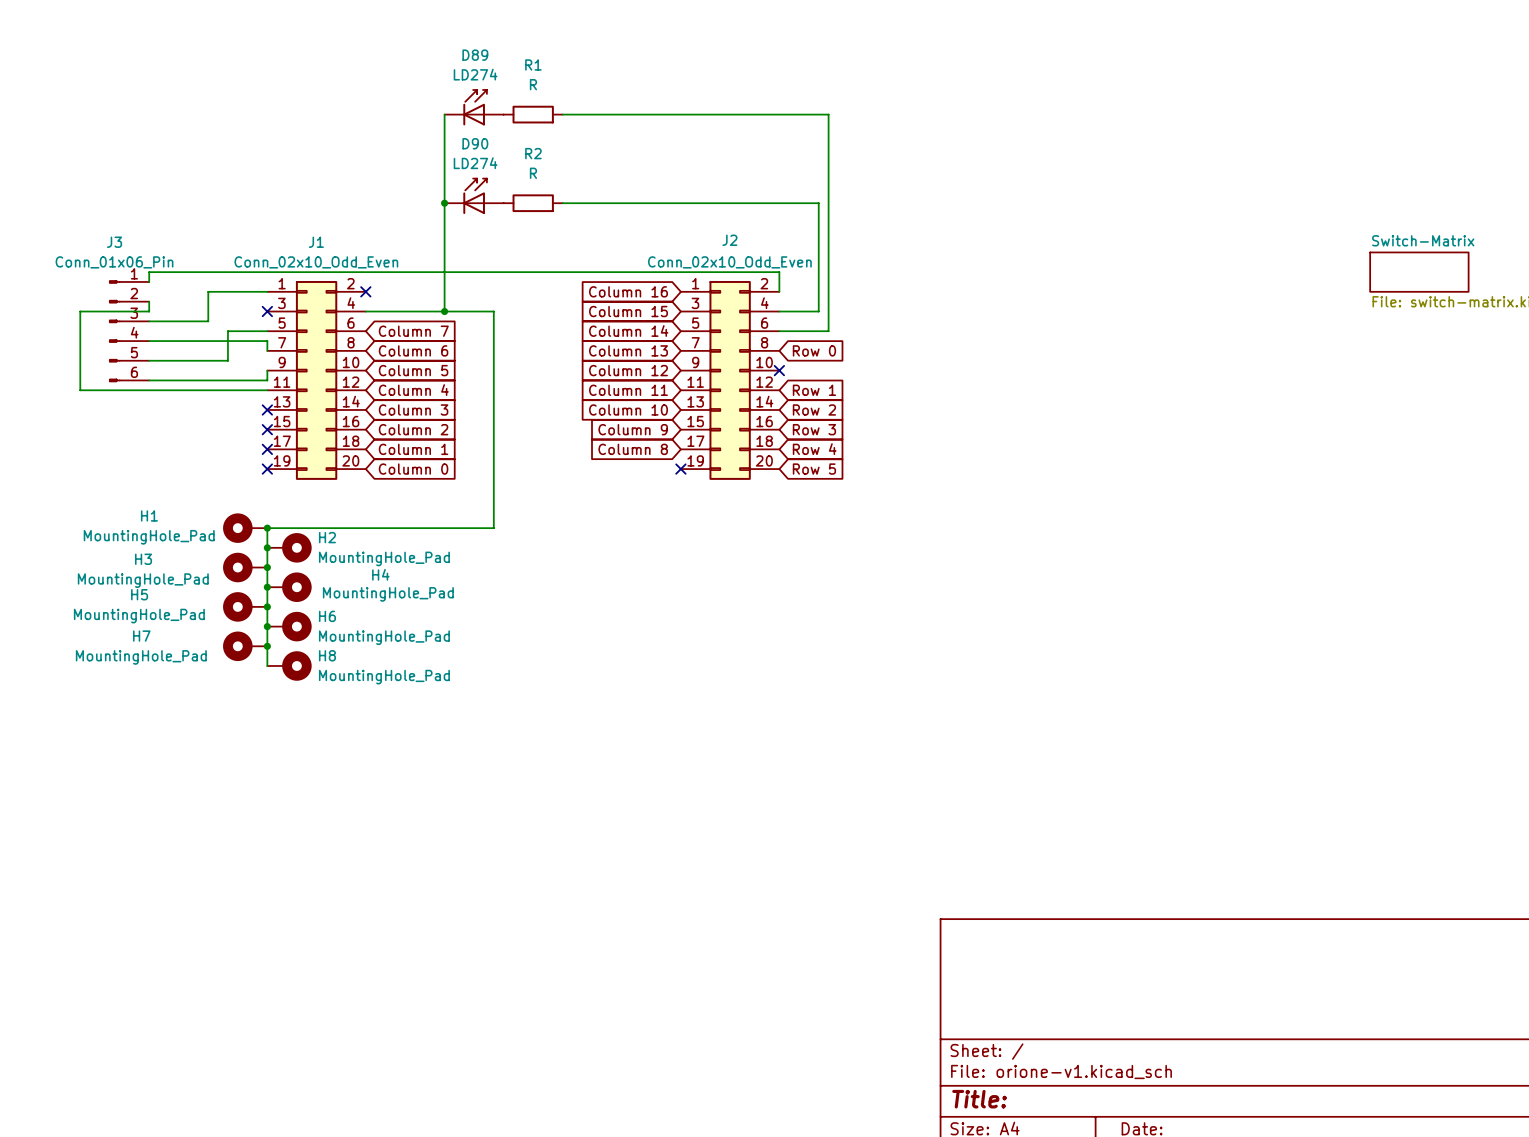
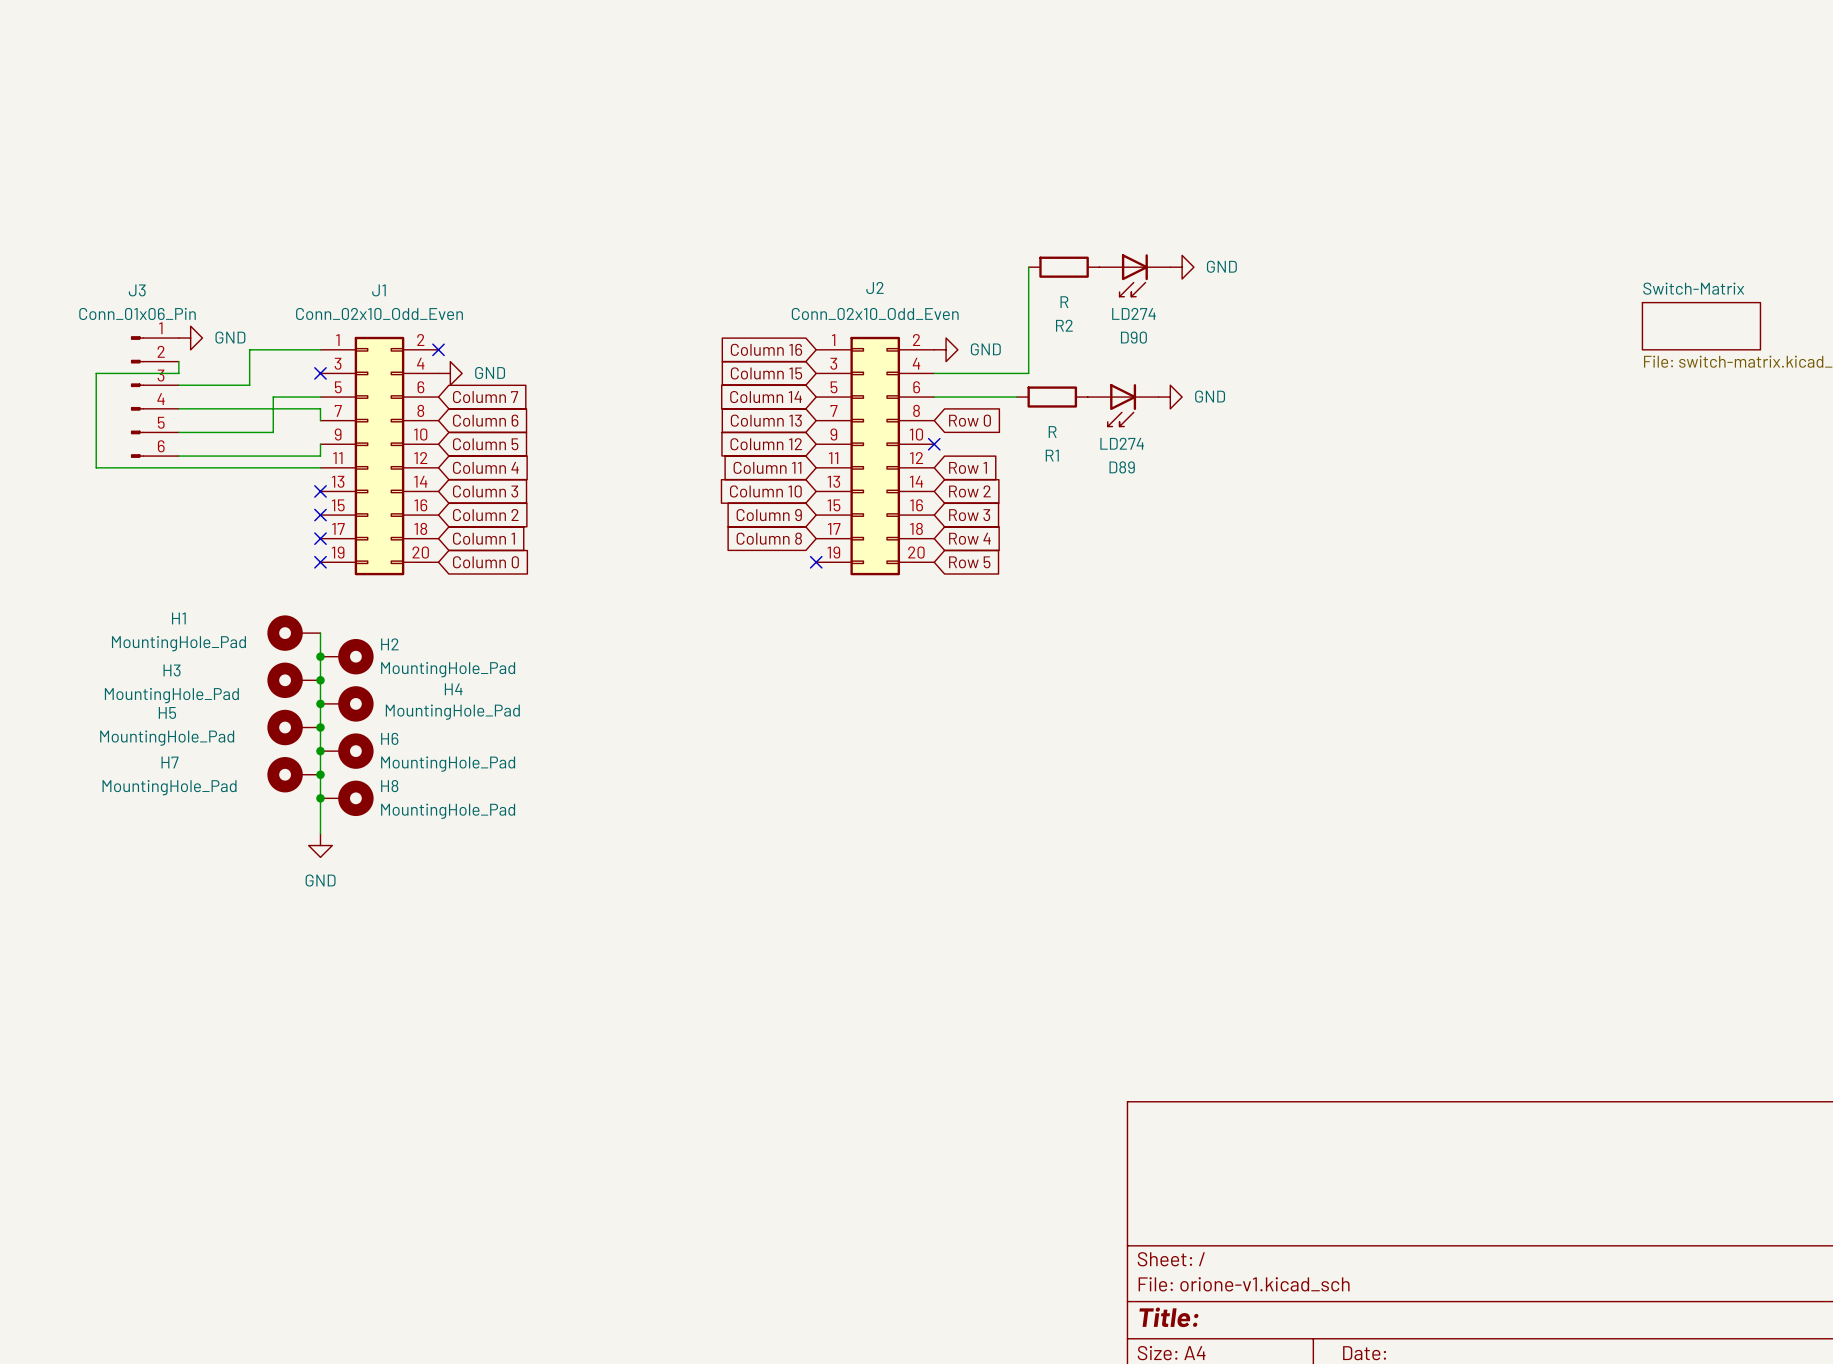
R1 name position: R1 (533, 64) -> R1 (1052, 455)
R1 value position: R (533, 84) -> R (1052, 432)
D89 position: (474, 107) -> (1123, 405)
D89 rotation: 0° (475, 107) -> 180° (1121, 405)
wire: (444, 114) (444, 311) -> none
R1 position: (533, 114) -> (1052, 397)
wire: (562, 114) (828, 114) (828, 331) -> (1016, 397) (993, 397)
R2 name position: R2 (533, 153) -> R2 (1064, 325)
R2 value position: R (533, 173) -> R (1064, 302)
D90 position: (474, 196) -> (1134, 275)
D90 rotation: 0° (475, 196) -> 180° (1133, 275)
junction: (444, 203) -> none
R2 position: (533, 203) -> (1064, 267)
wire: (562, 203) (818, 203) (818, 311) -> (1028, 267) (1028, 373) (981, 373)
power symbol: none -> GND (1182, 267)
wire: (149, 281) (149, 272) (779, 272) (779, 291) -> none
power symbol: none -> GND (190, 338)
power symbol: none -> GND (946, 349)
wire: (365, 311) (493, 311) (493, 528) (267, 528) -> none
power symbol: none -> GND (450, 373)
junction: (444, 311) -> none
power symbol: none -> GND (1170, 397)
junction: (267, 528) -> none
wire: none -> (320, 798) (320, 833)
junction: none -> (320, 798)
power symbol: none -> GND (320, 845)

